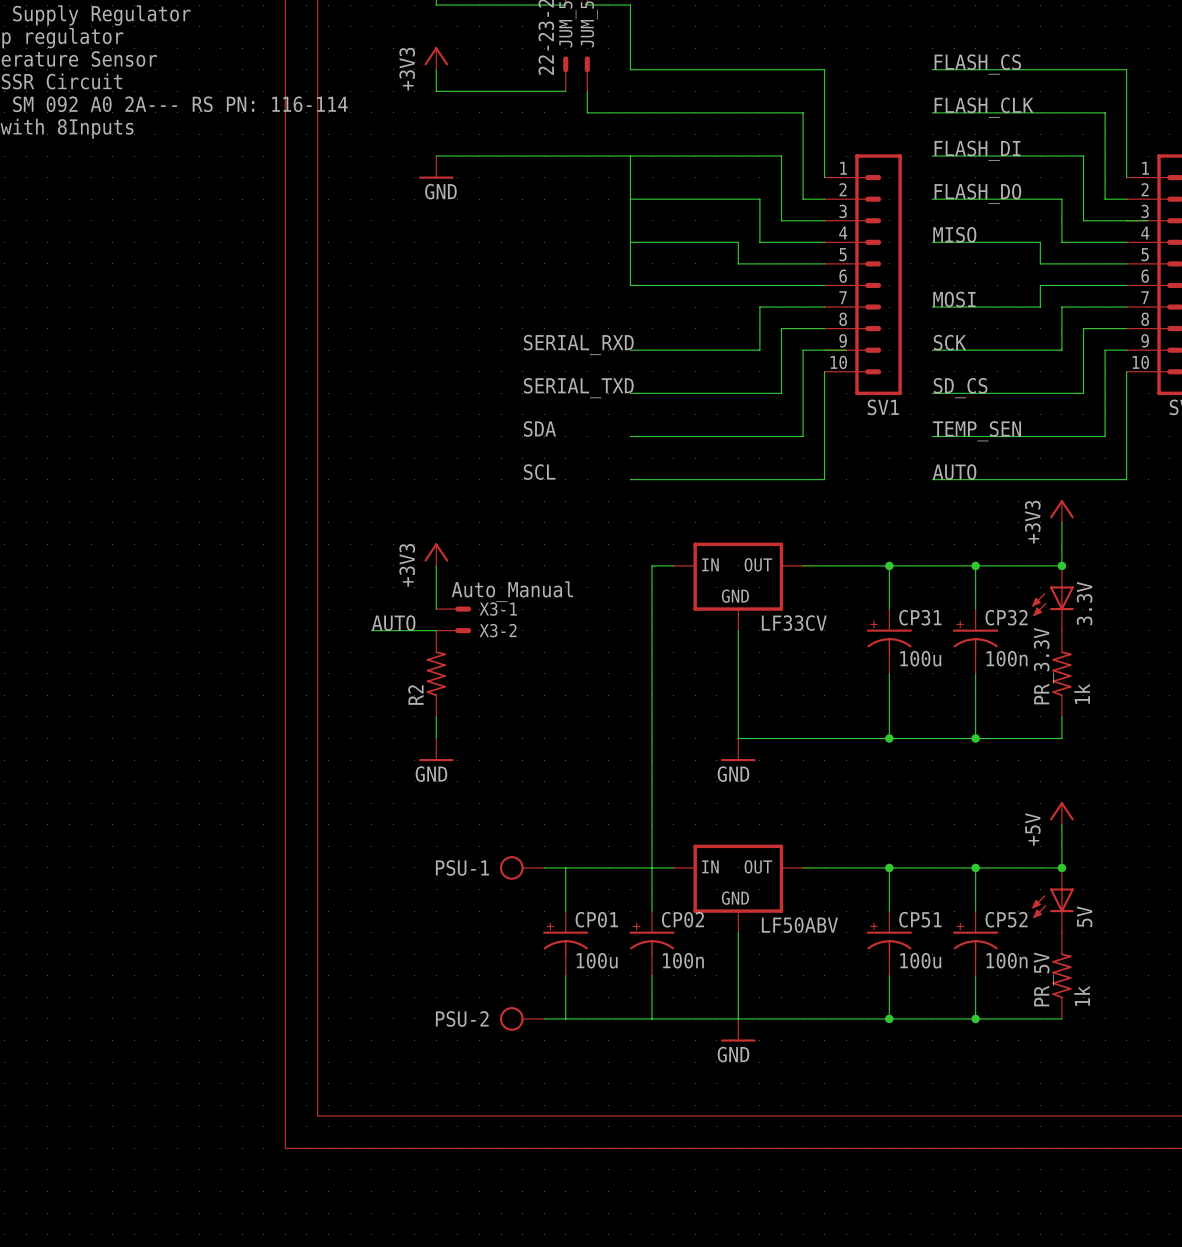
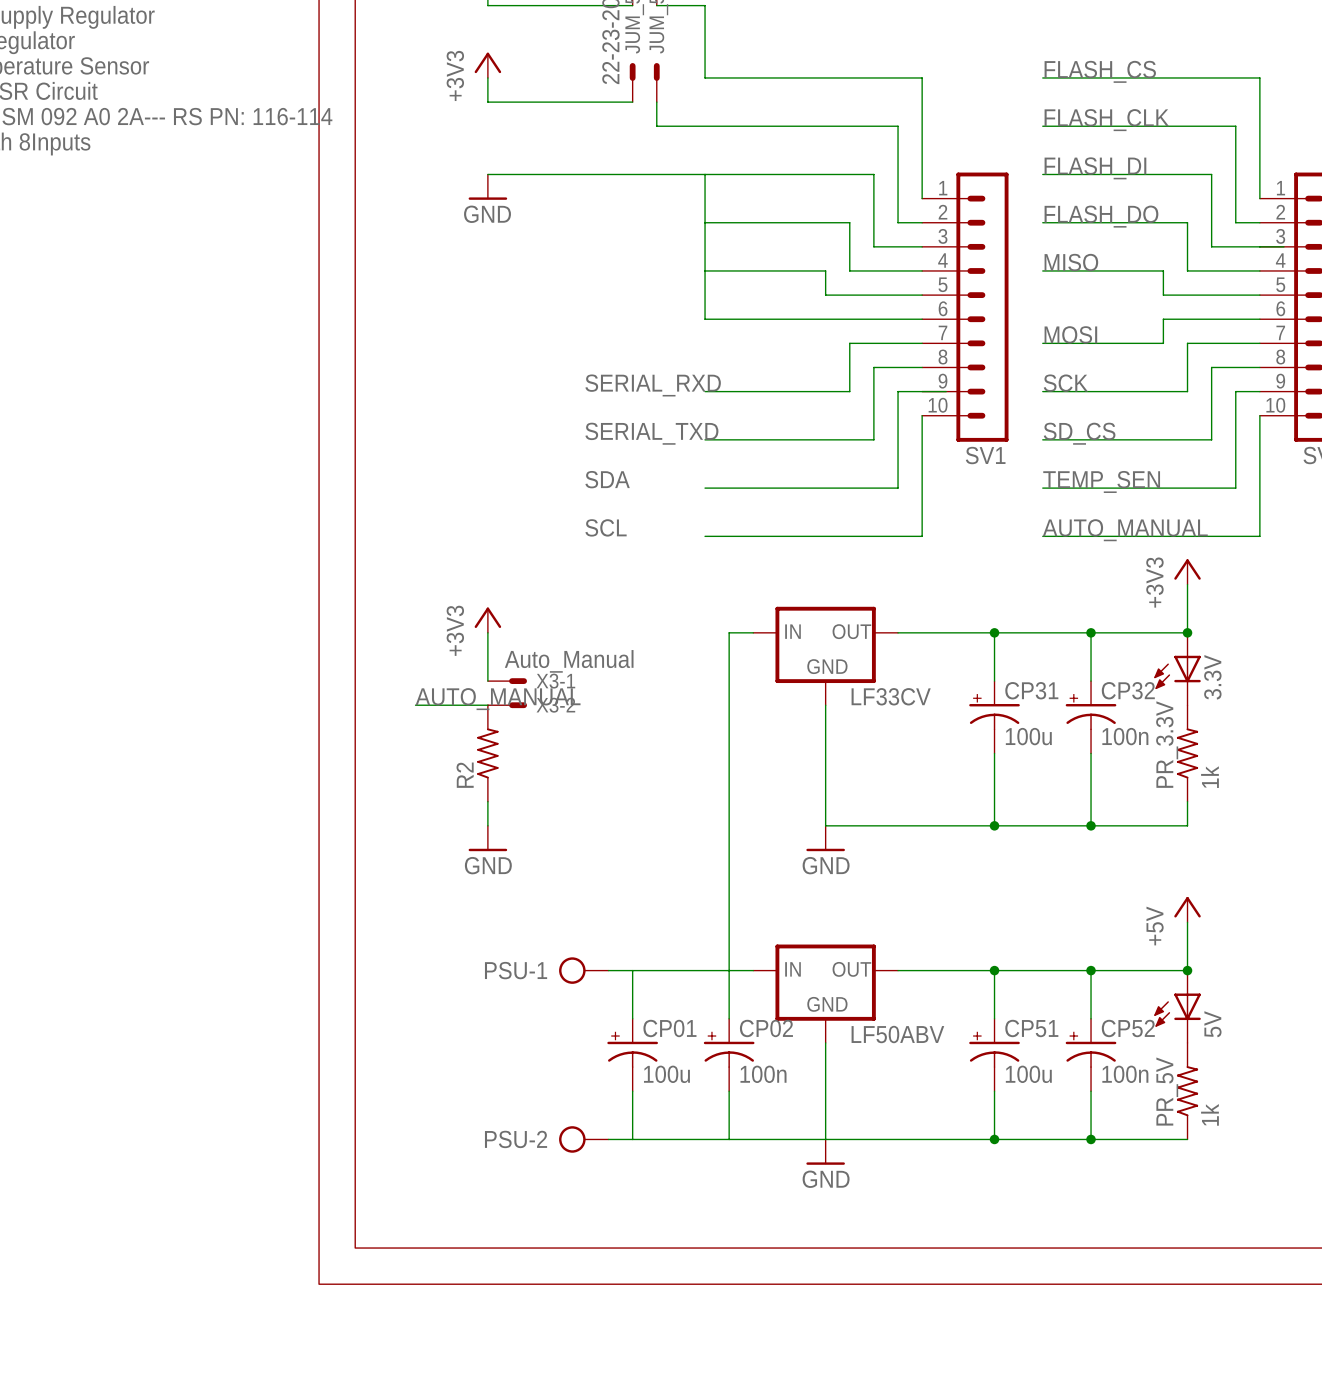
label: AUTO (954, 472) -> AUTO_MANUAL (1125, 530)
label: AUTO (393, 623) -> AUTO_MANUAL (498, 699)

